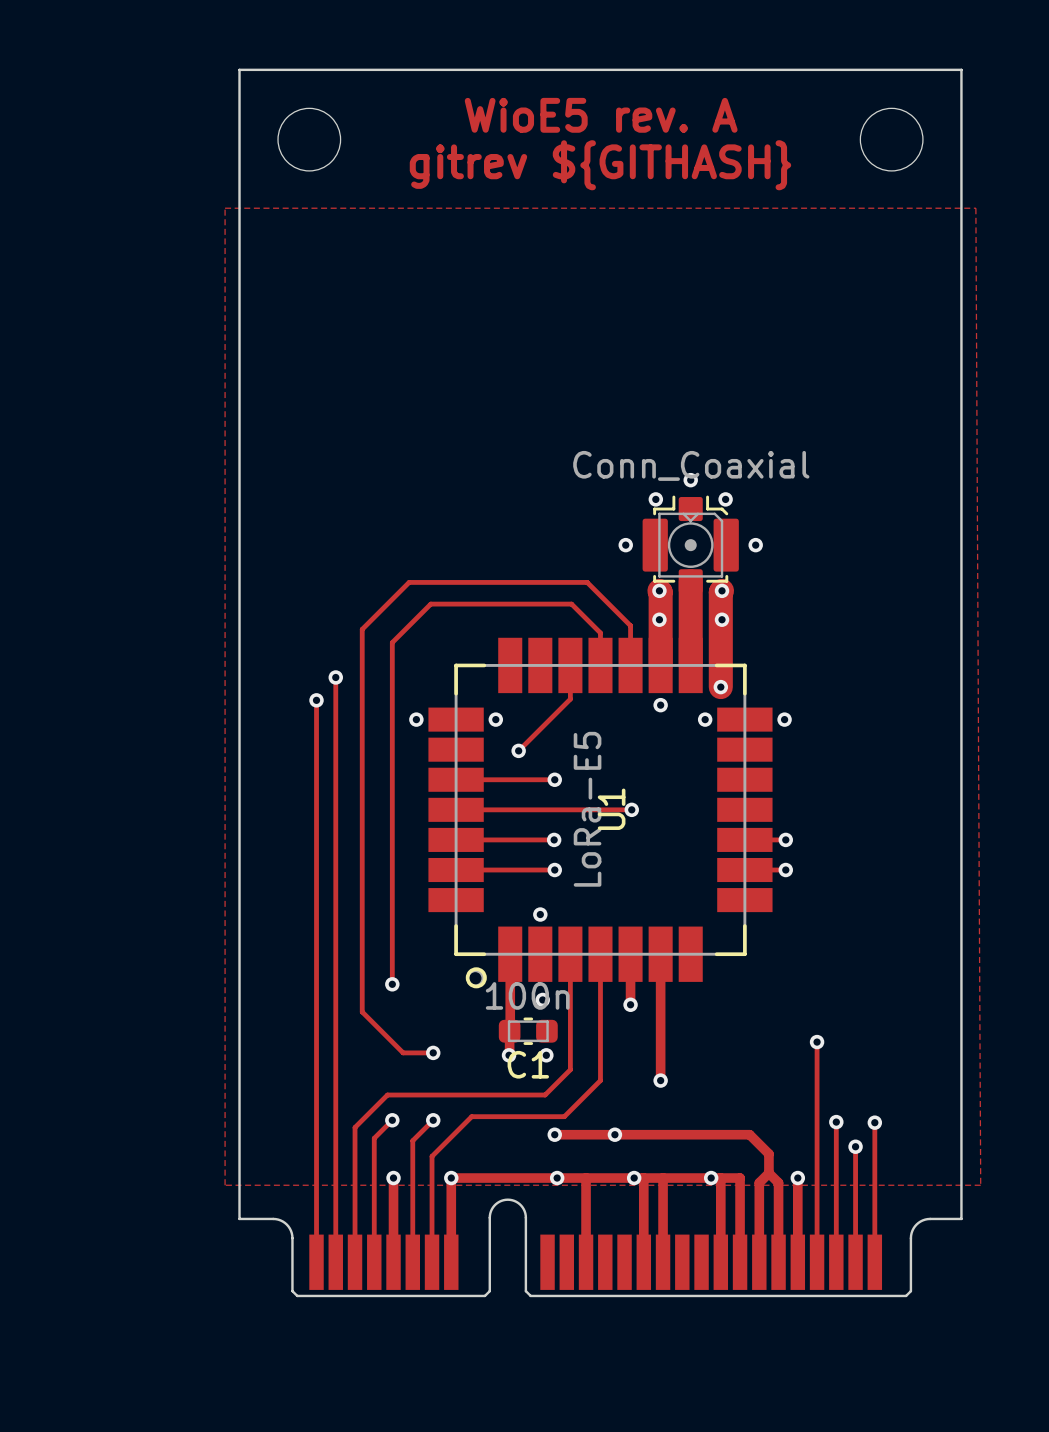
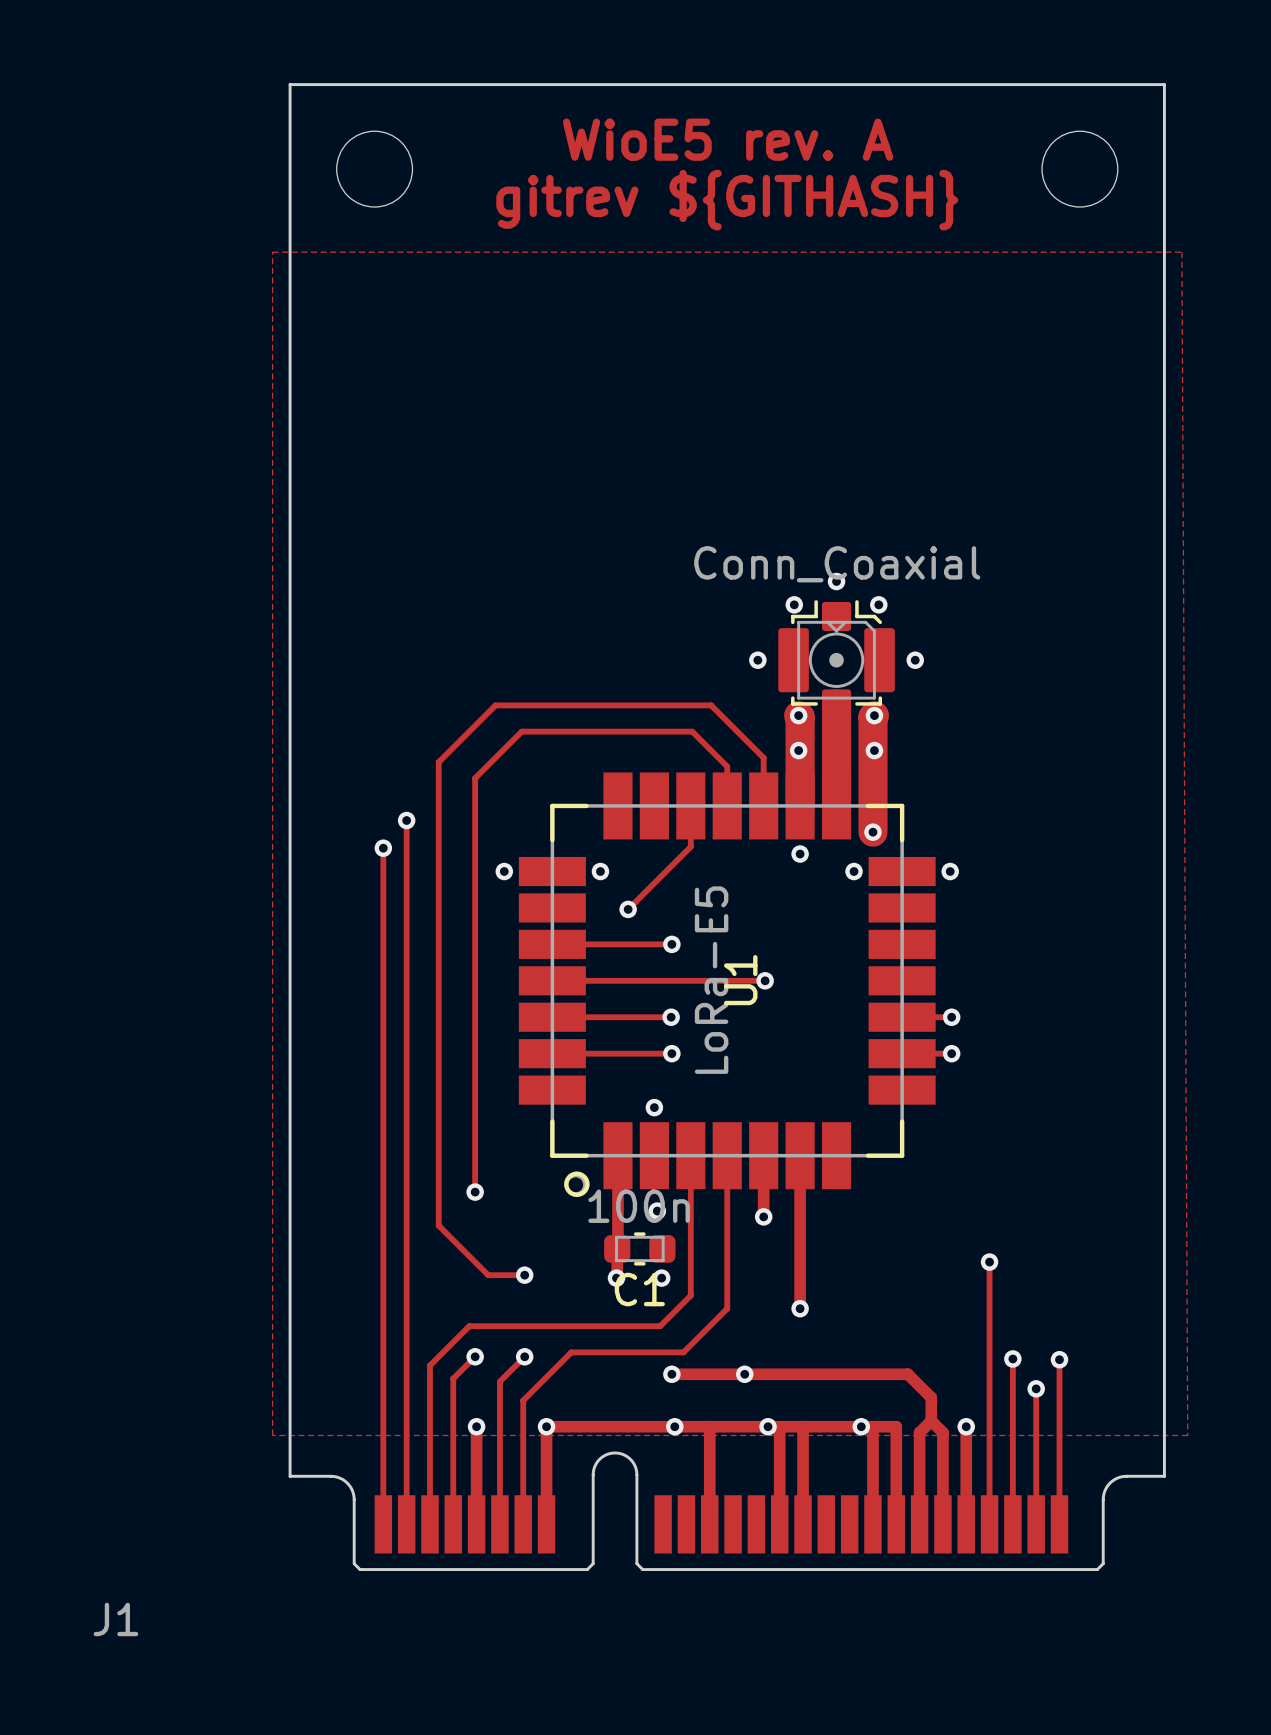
part: (600, 682) -> none
J1: none -> (727, 827)

